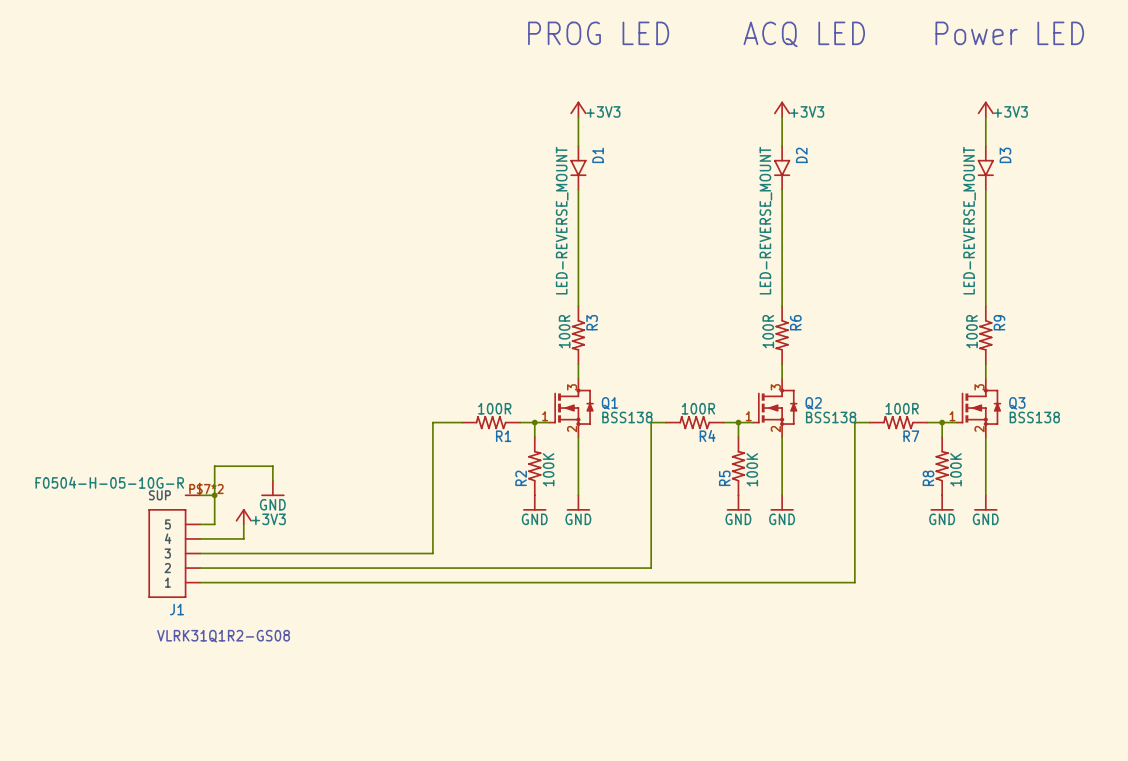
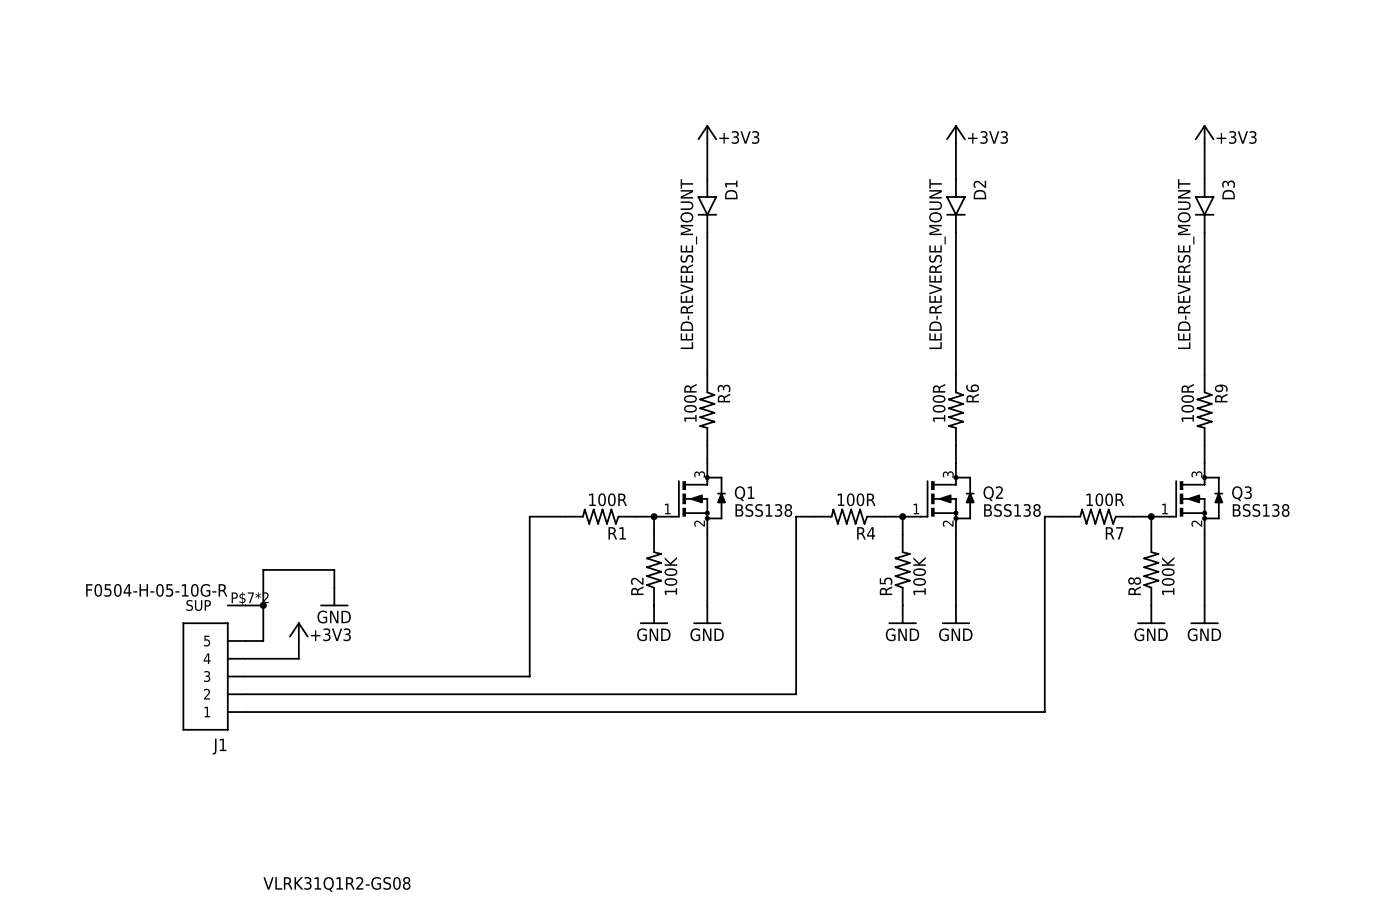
text: PROG LED (598, 33) -> none
text: Power LED (1009, 33) -> none
text: ACQ LED (804, 34) -> none
text position: VLRK31Q1R2-GS08 (223, 636) -> VLRK31Q1R2-GS08 (336, 884)

